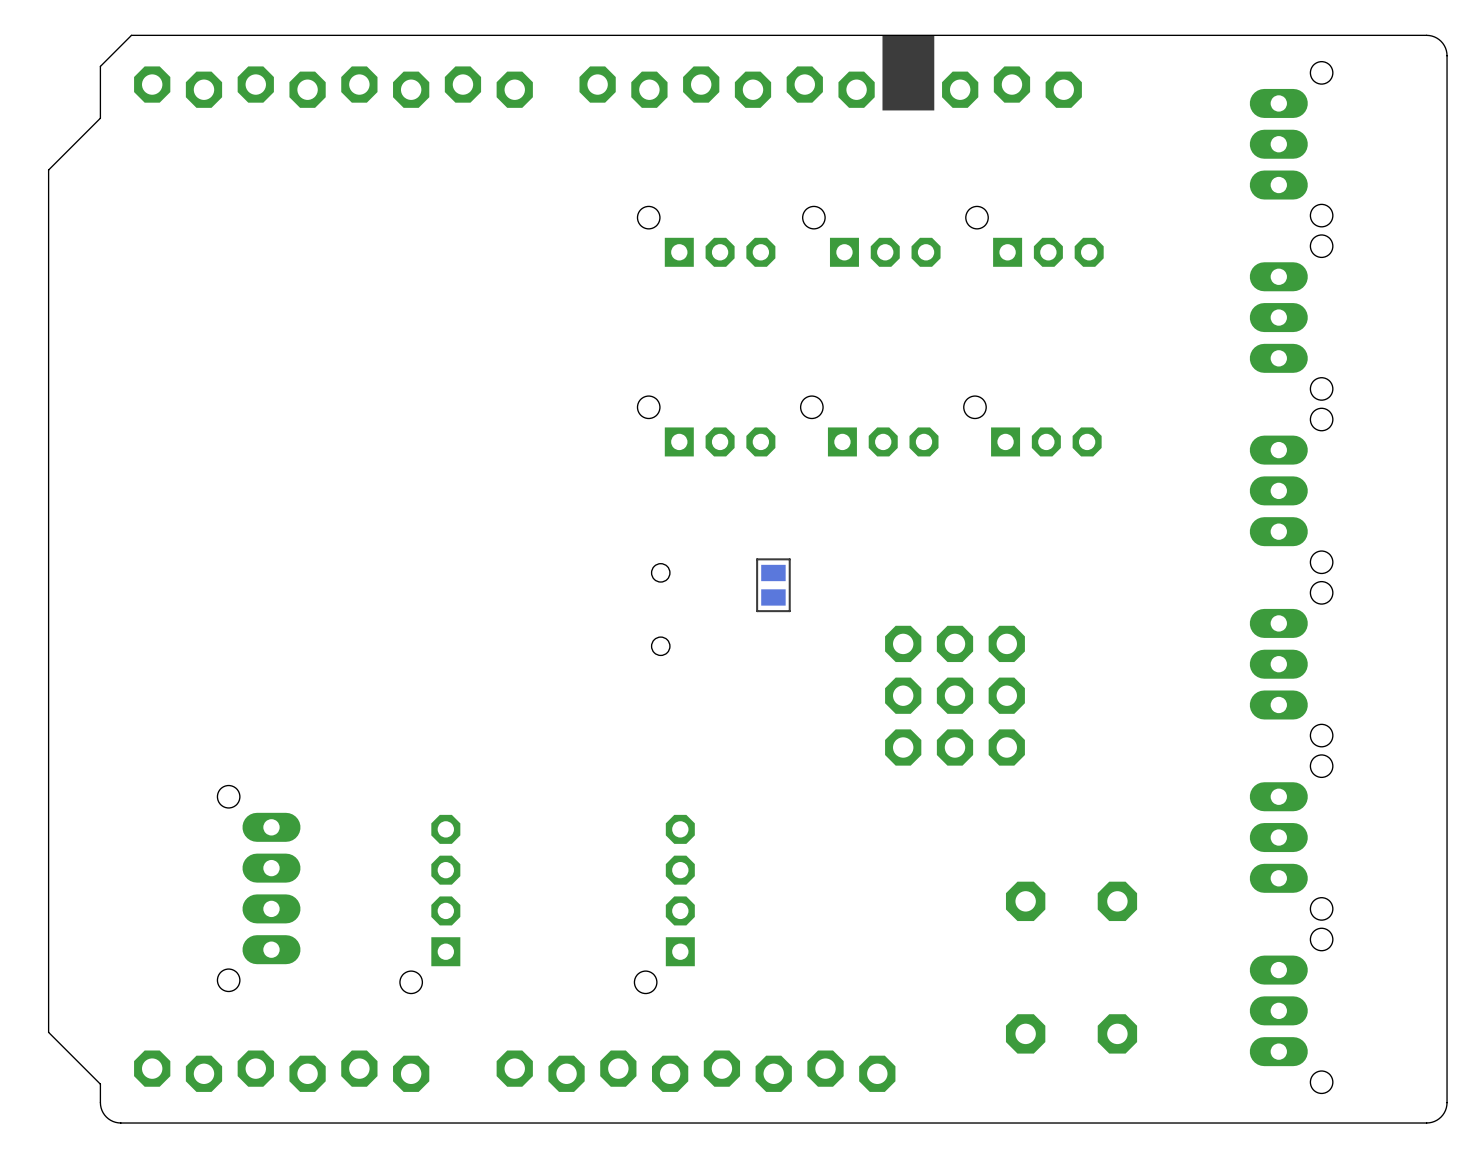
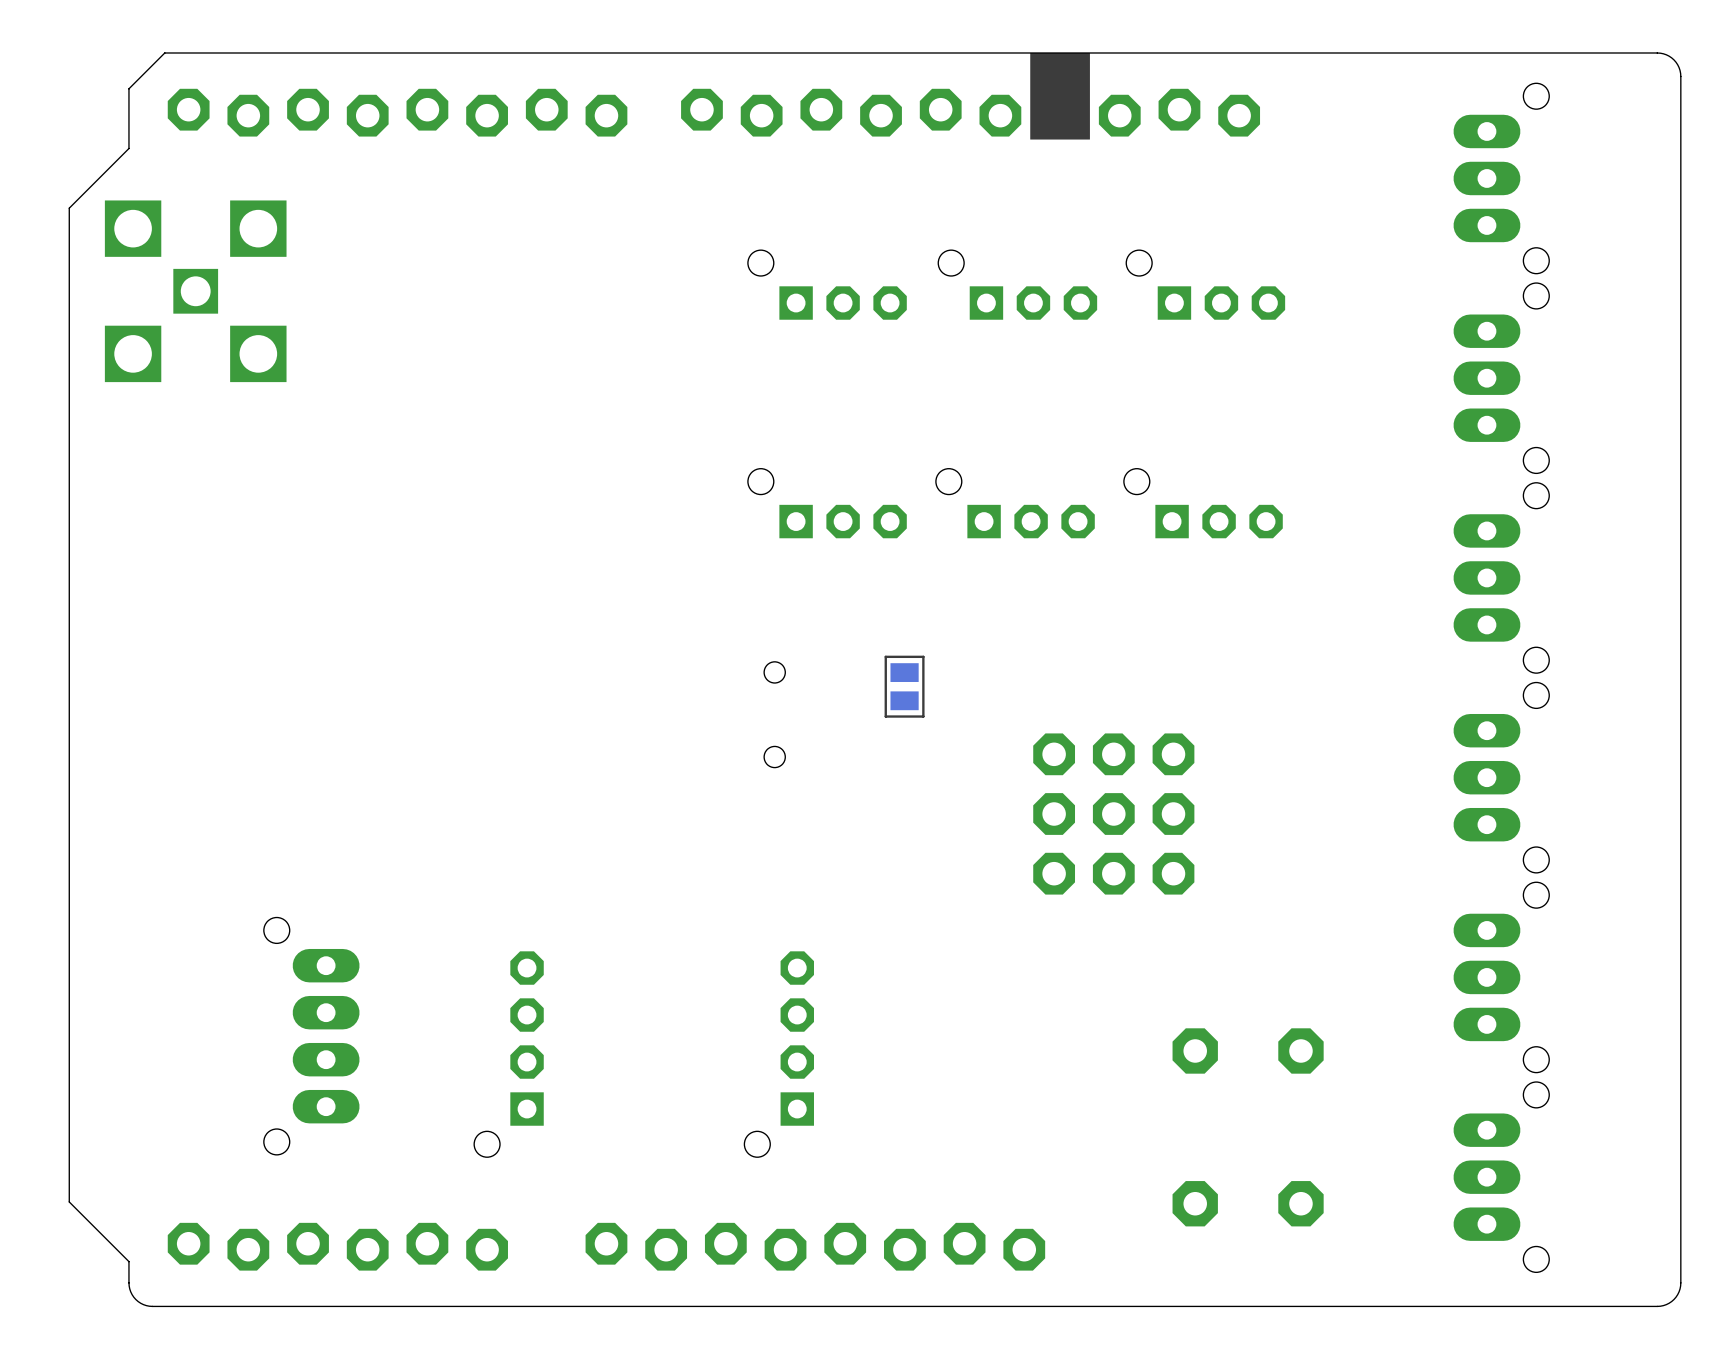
part: none -> (195, 291)

